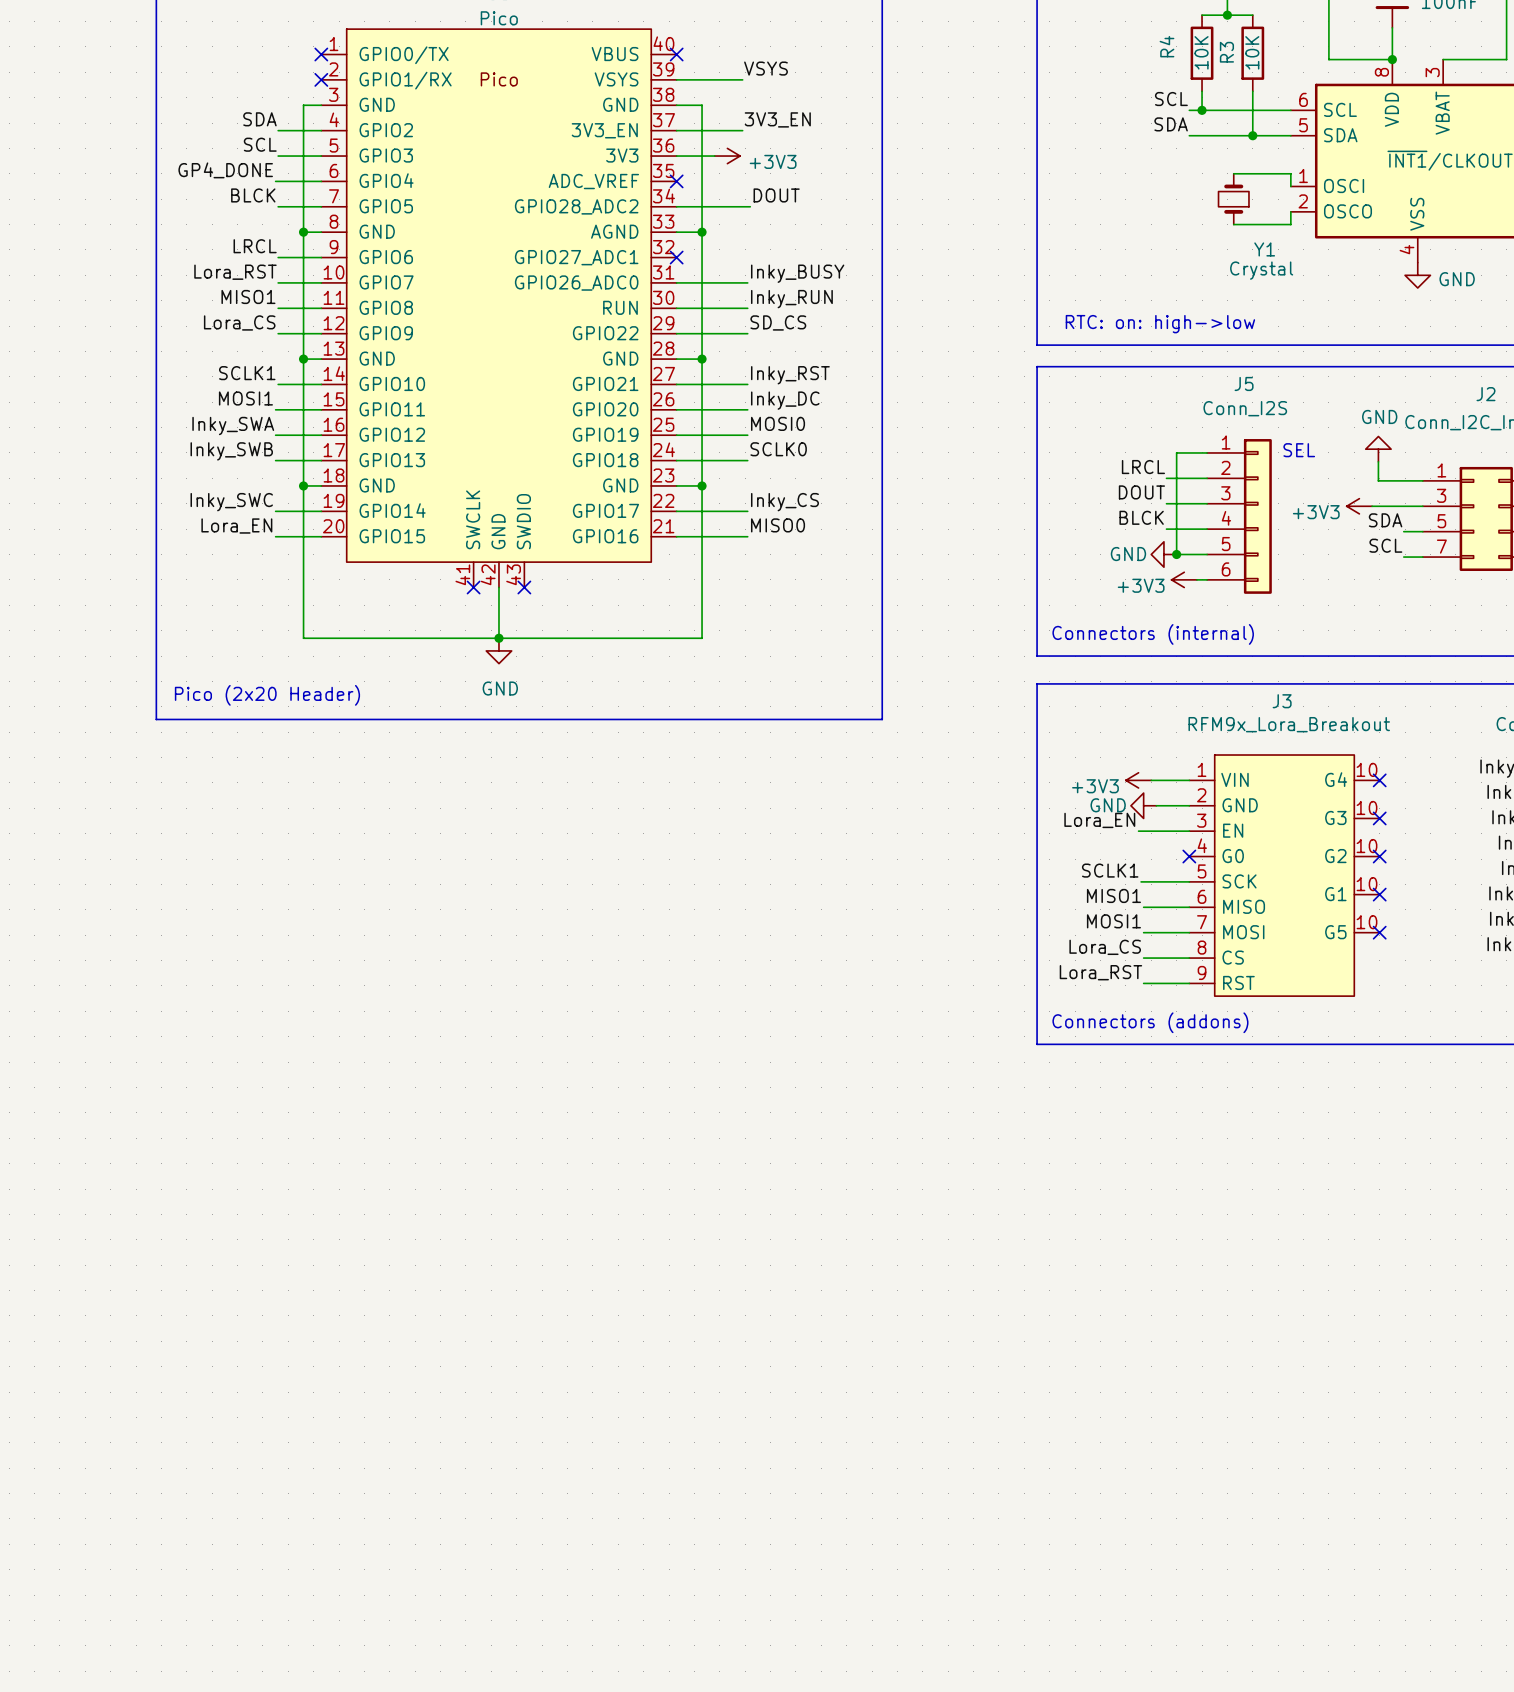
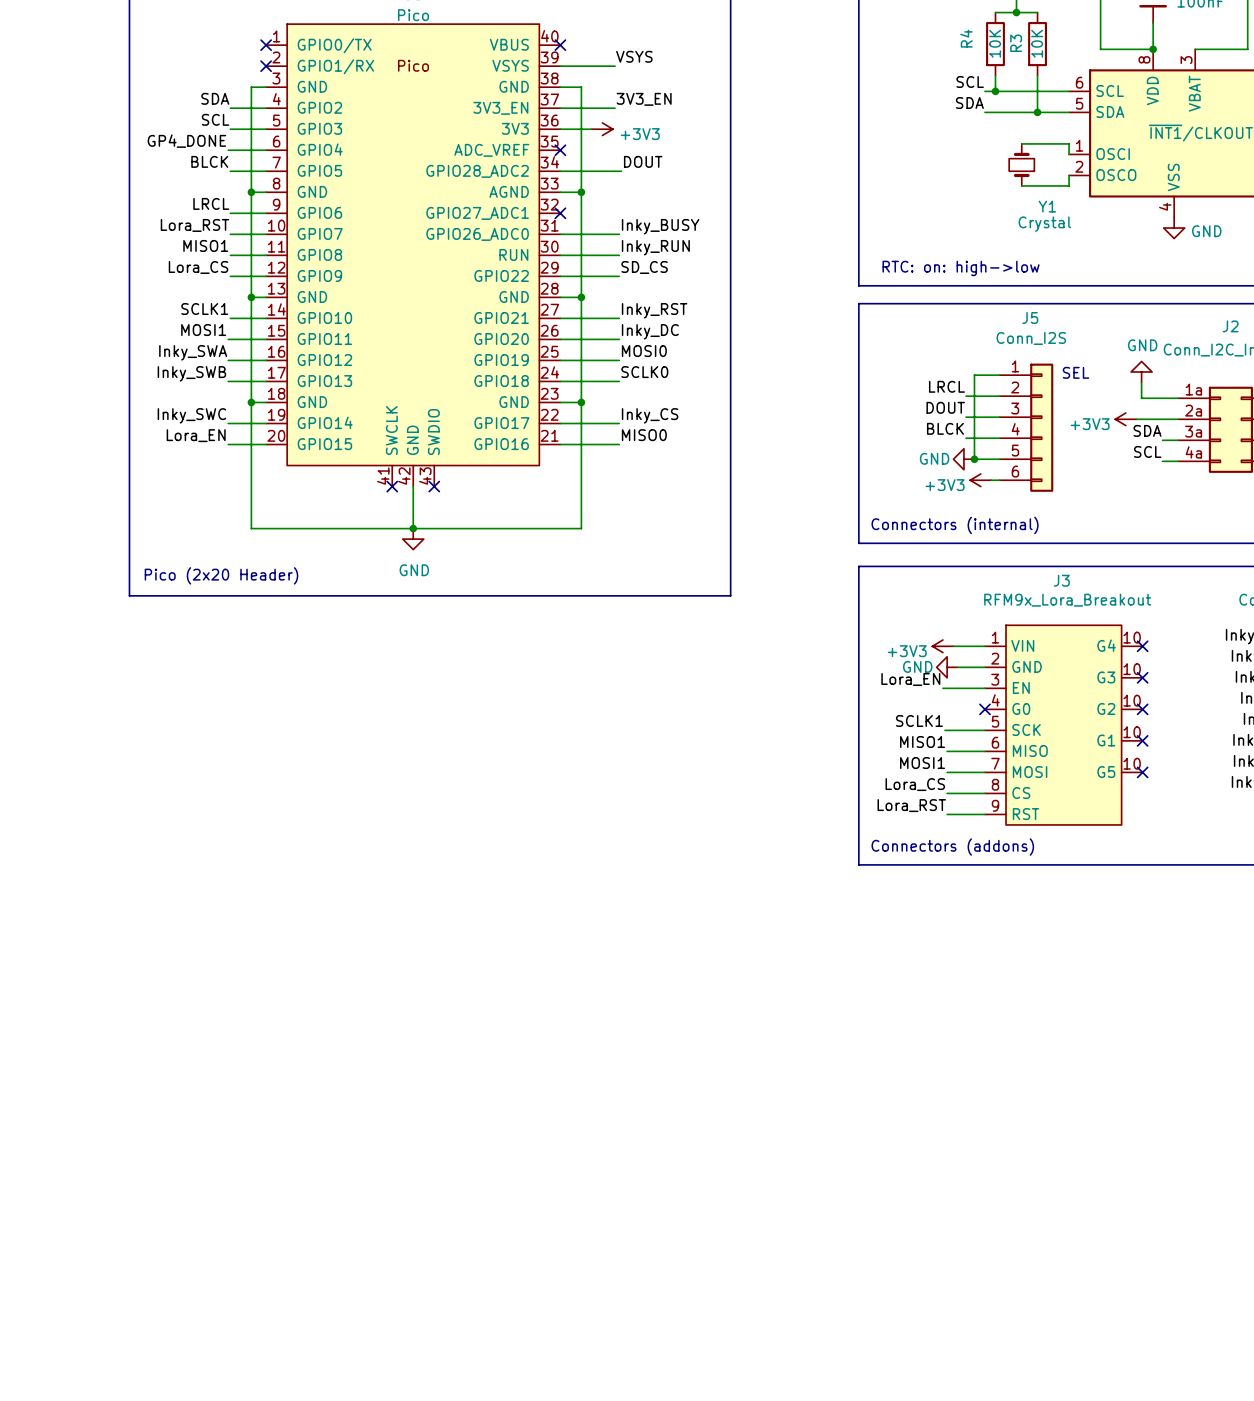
J2 pin number: 1 (1441, 470) -> 1a (1193, 389)
J2 pin number: 3 (1441, 495) -> 2a (1193, 410)
J2 pin number: 5 (1441, 521) -> 3a (1193, 431)
J2 pin number: 7 (1441, 546) -> 4a (1193, 452)

